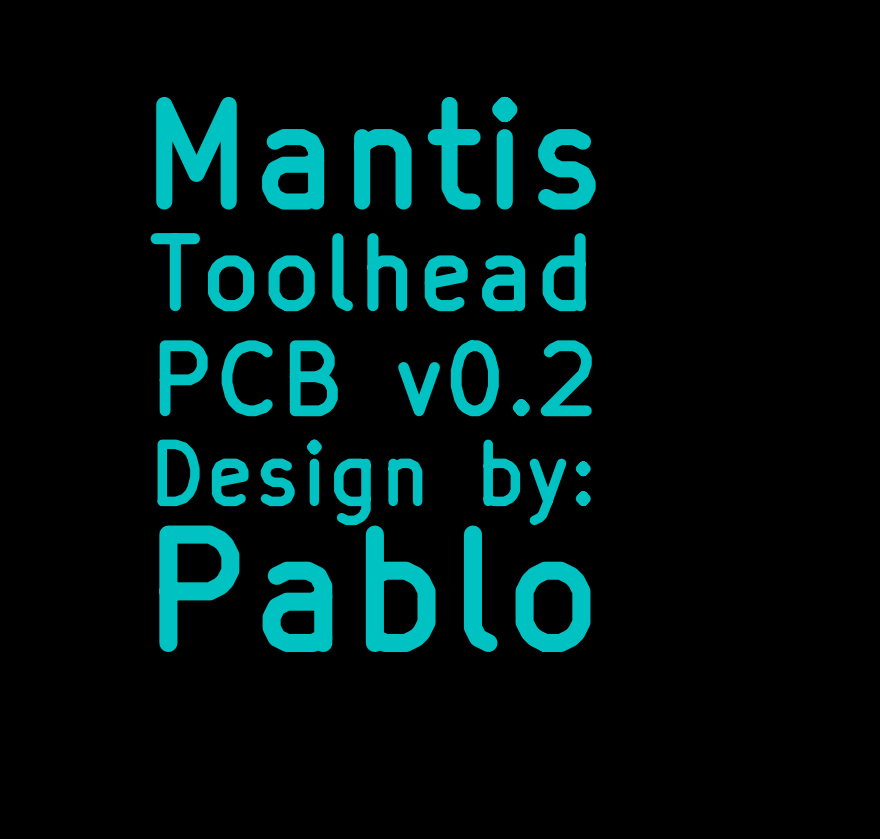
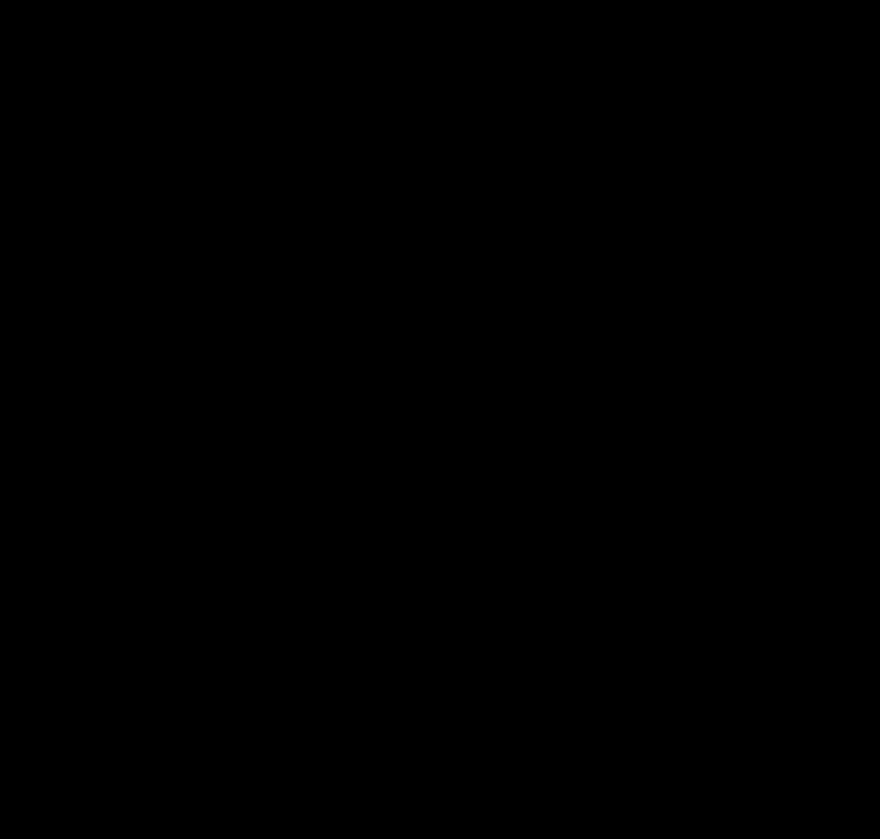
text: Mantis (375, 153) -> none
text: Toolhead (368, 272) -> none
text: PCB v0.2 (375, 378) -> none
text: Design by: (374, 482) -> none
text: Pablo (374, 588) -> none

